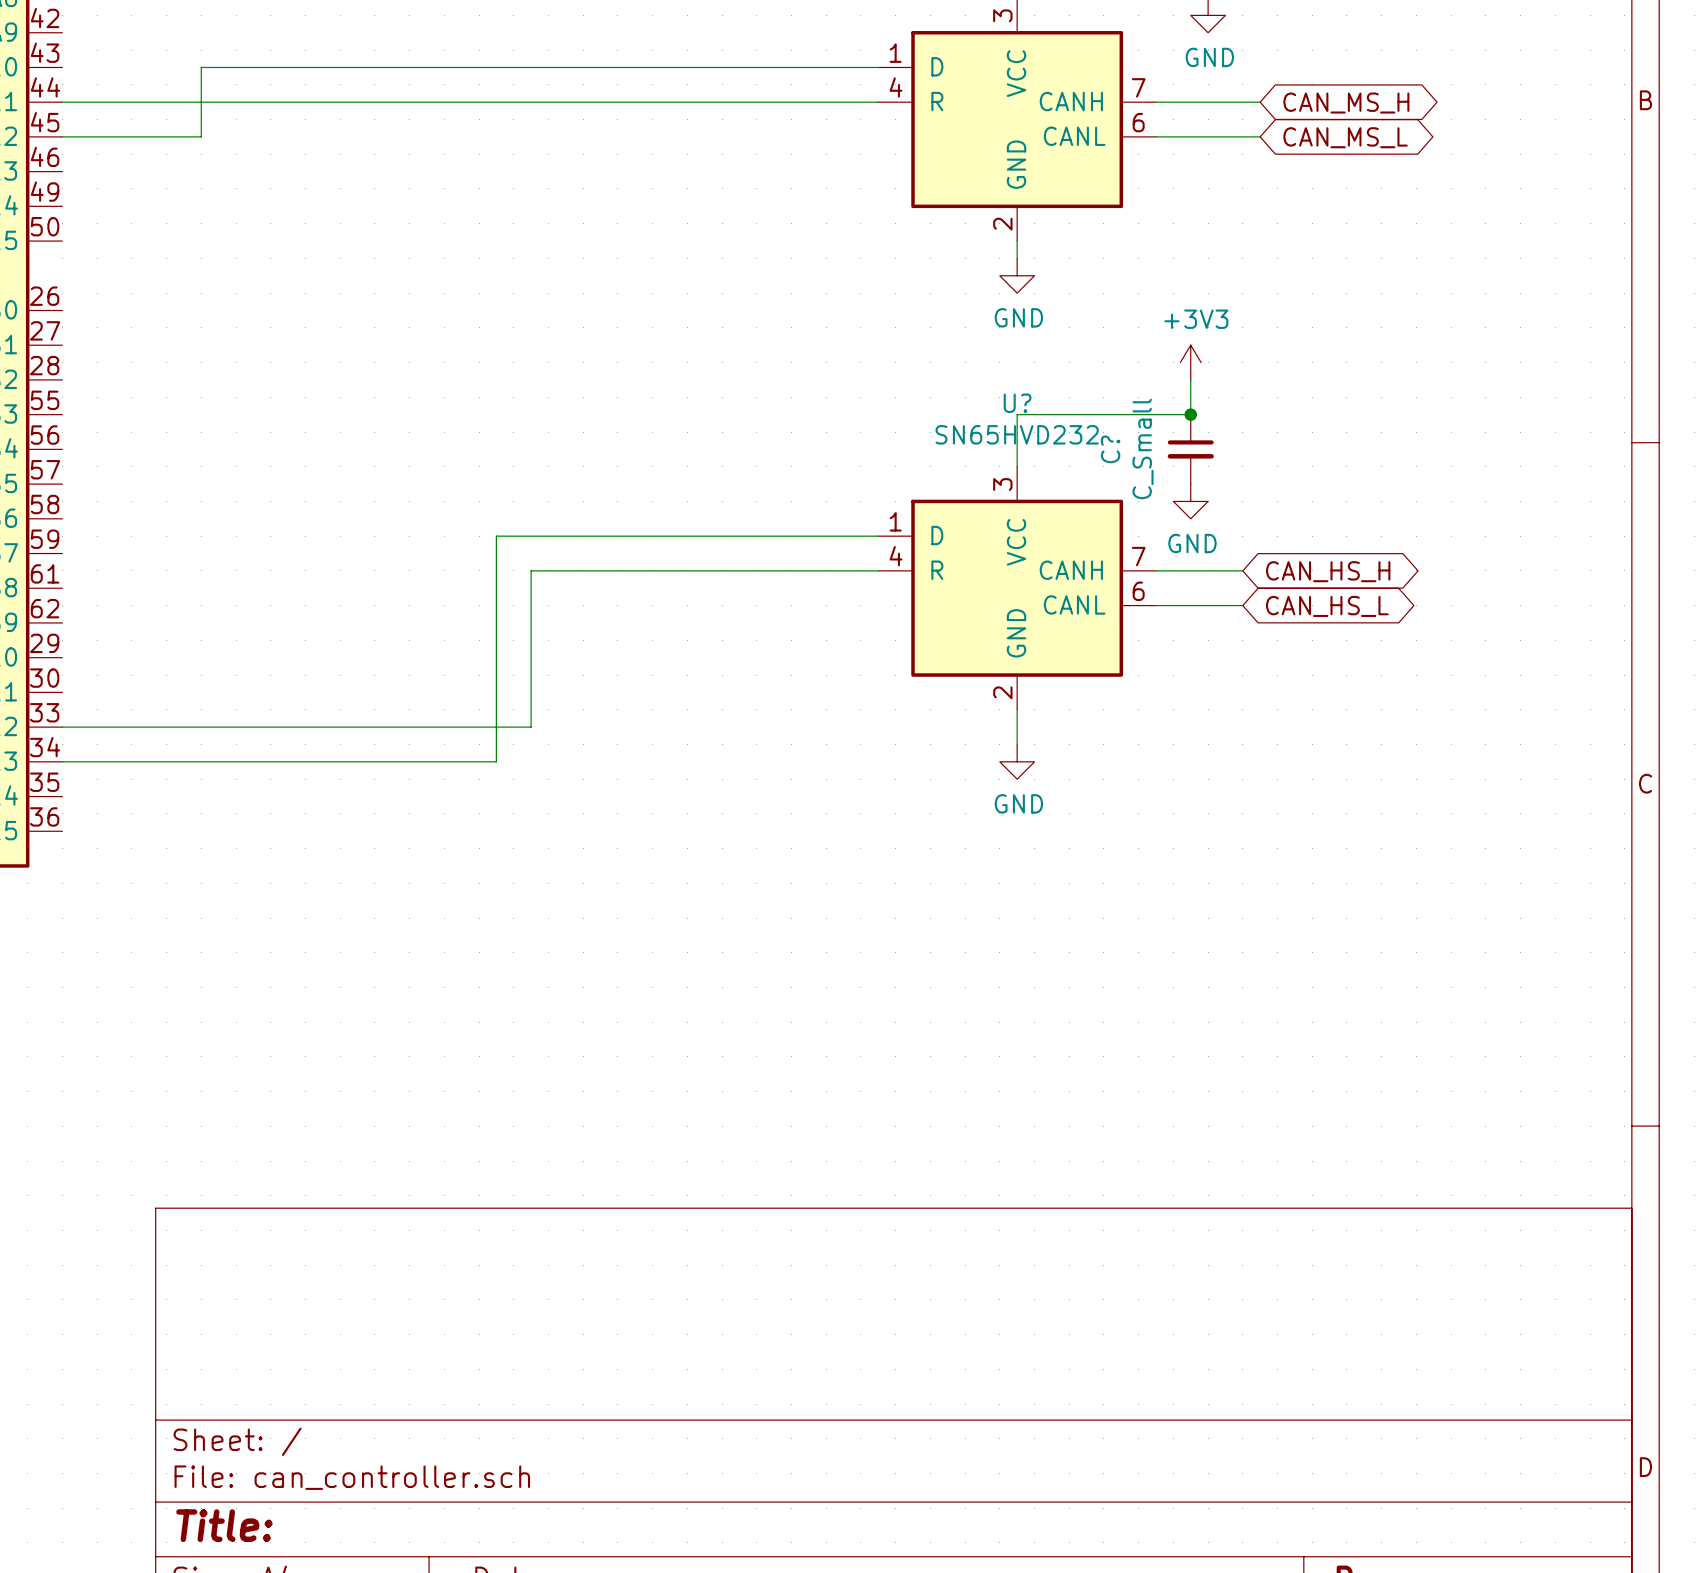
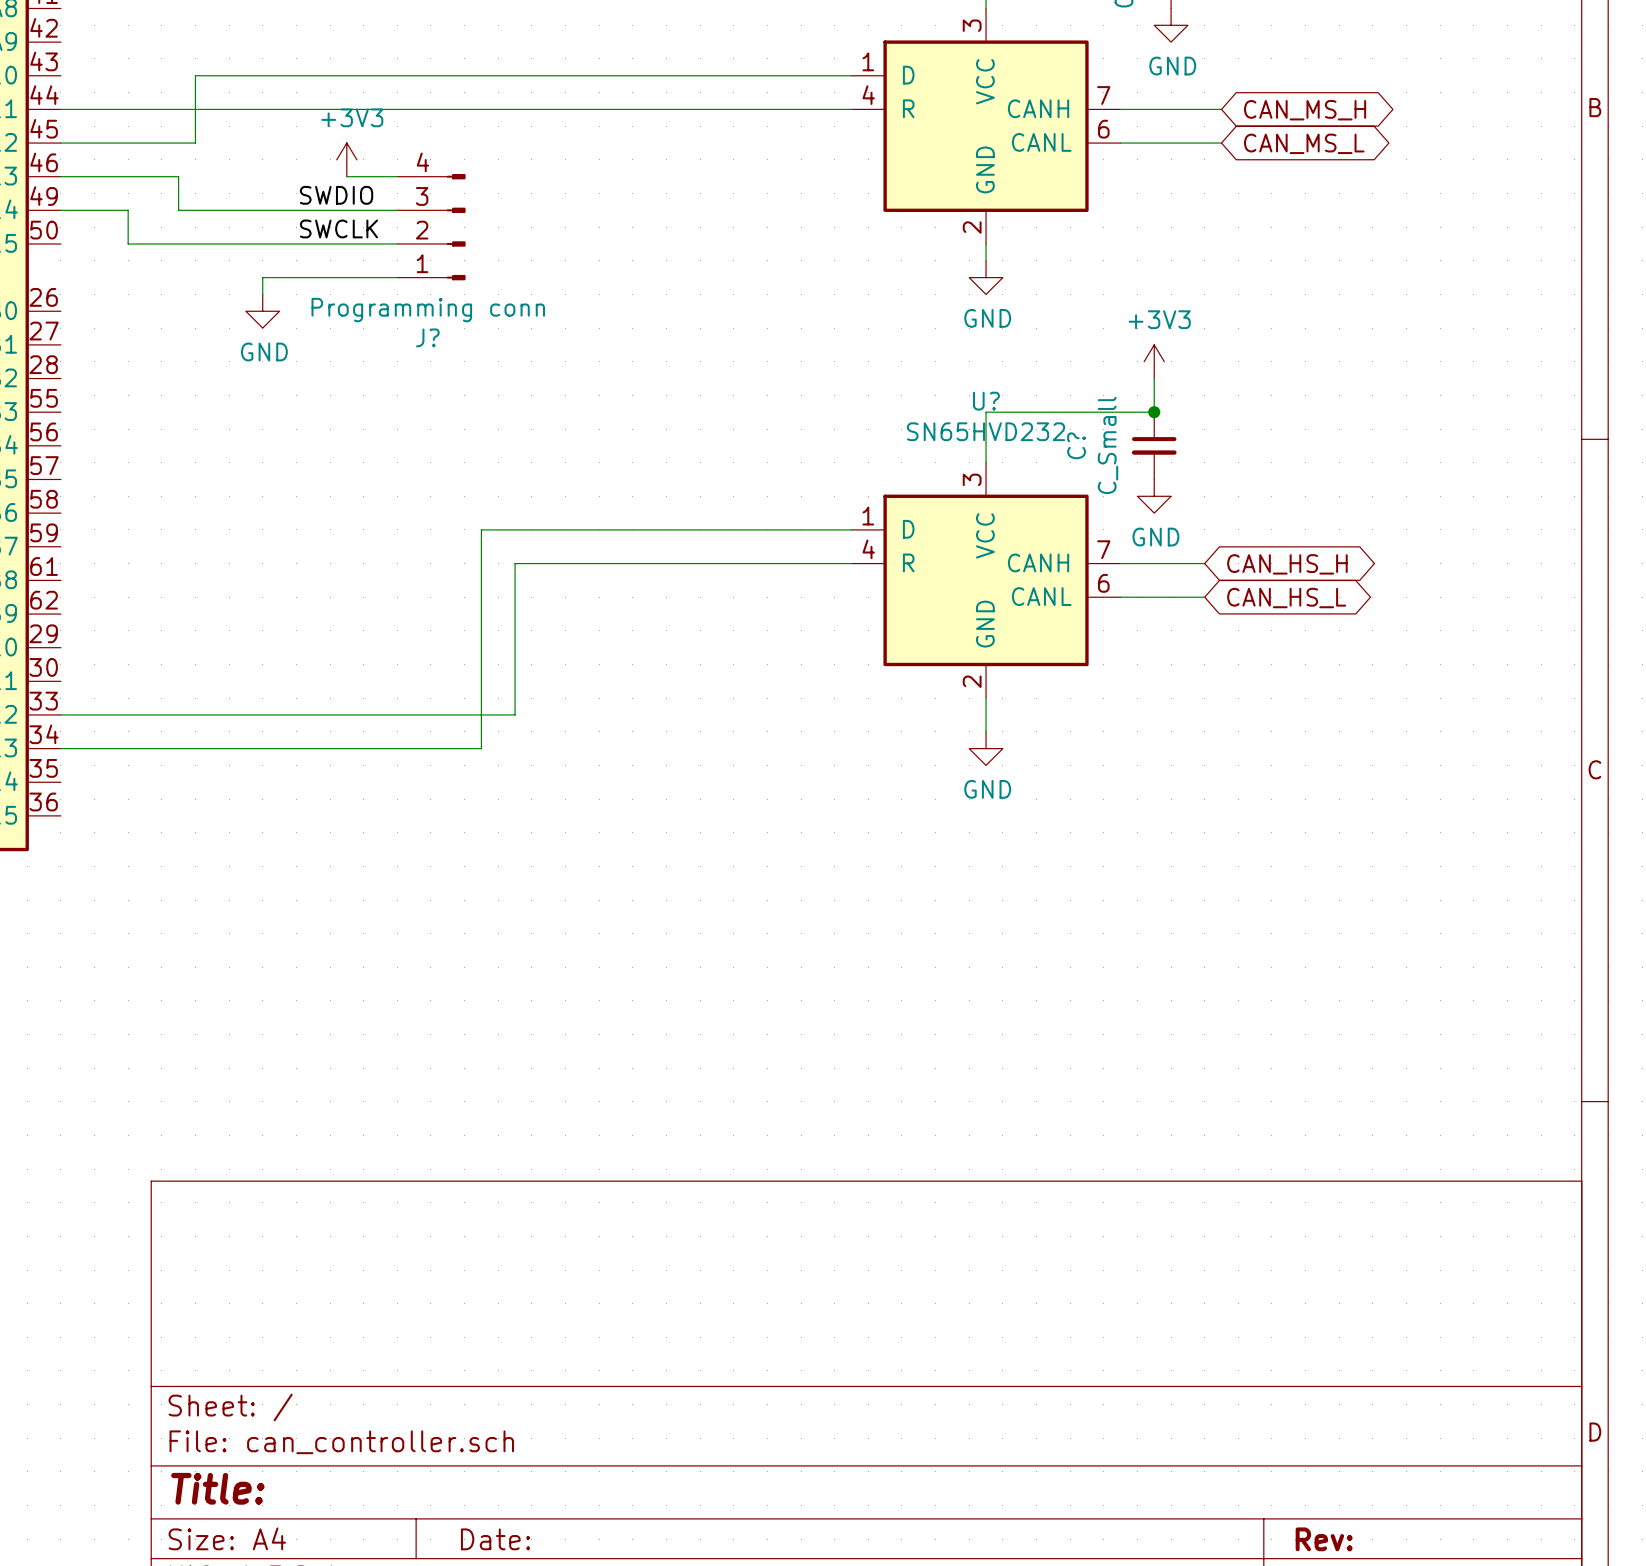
power symbol: none -> +3V3 (346, 159)
wire: none -> (60, 176) (178, 176) (178, 210) (397, 210)
wire: none -> (346, 176) (397, 176)
label: none -> SWDIO (336, 195)
wire: none -> (60, 210) (128, 210) (128, 243) (397, 243)
J?: none -> Programming conn (431, 227)
label: none -> SWCLK (338, 228)
wire: none -> (397, 277) (262, 277) (262, 294)
power symbol: none -> GND (262, 311)

